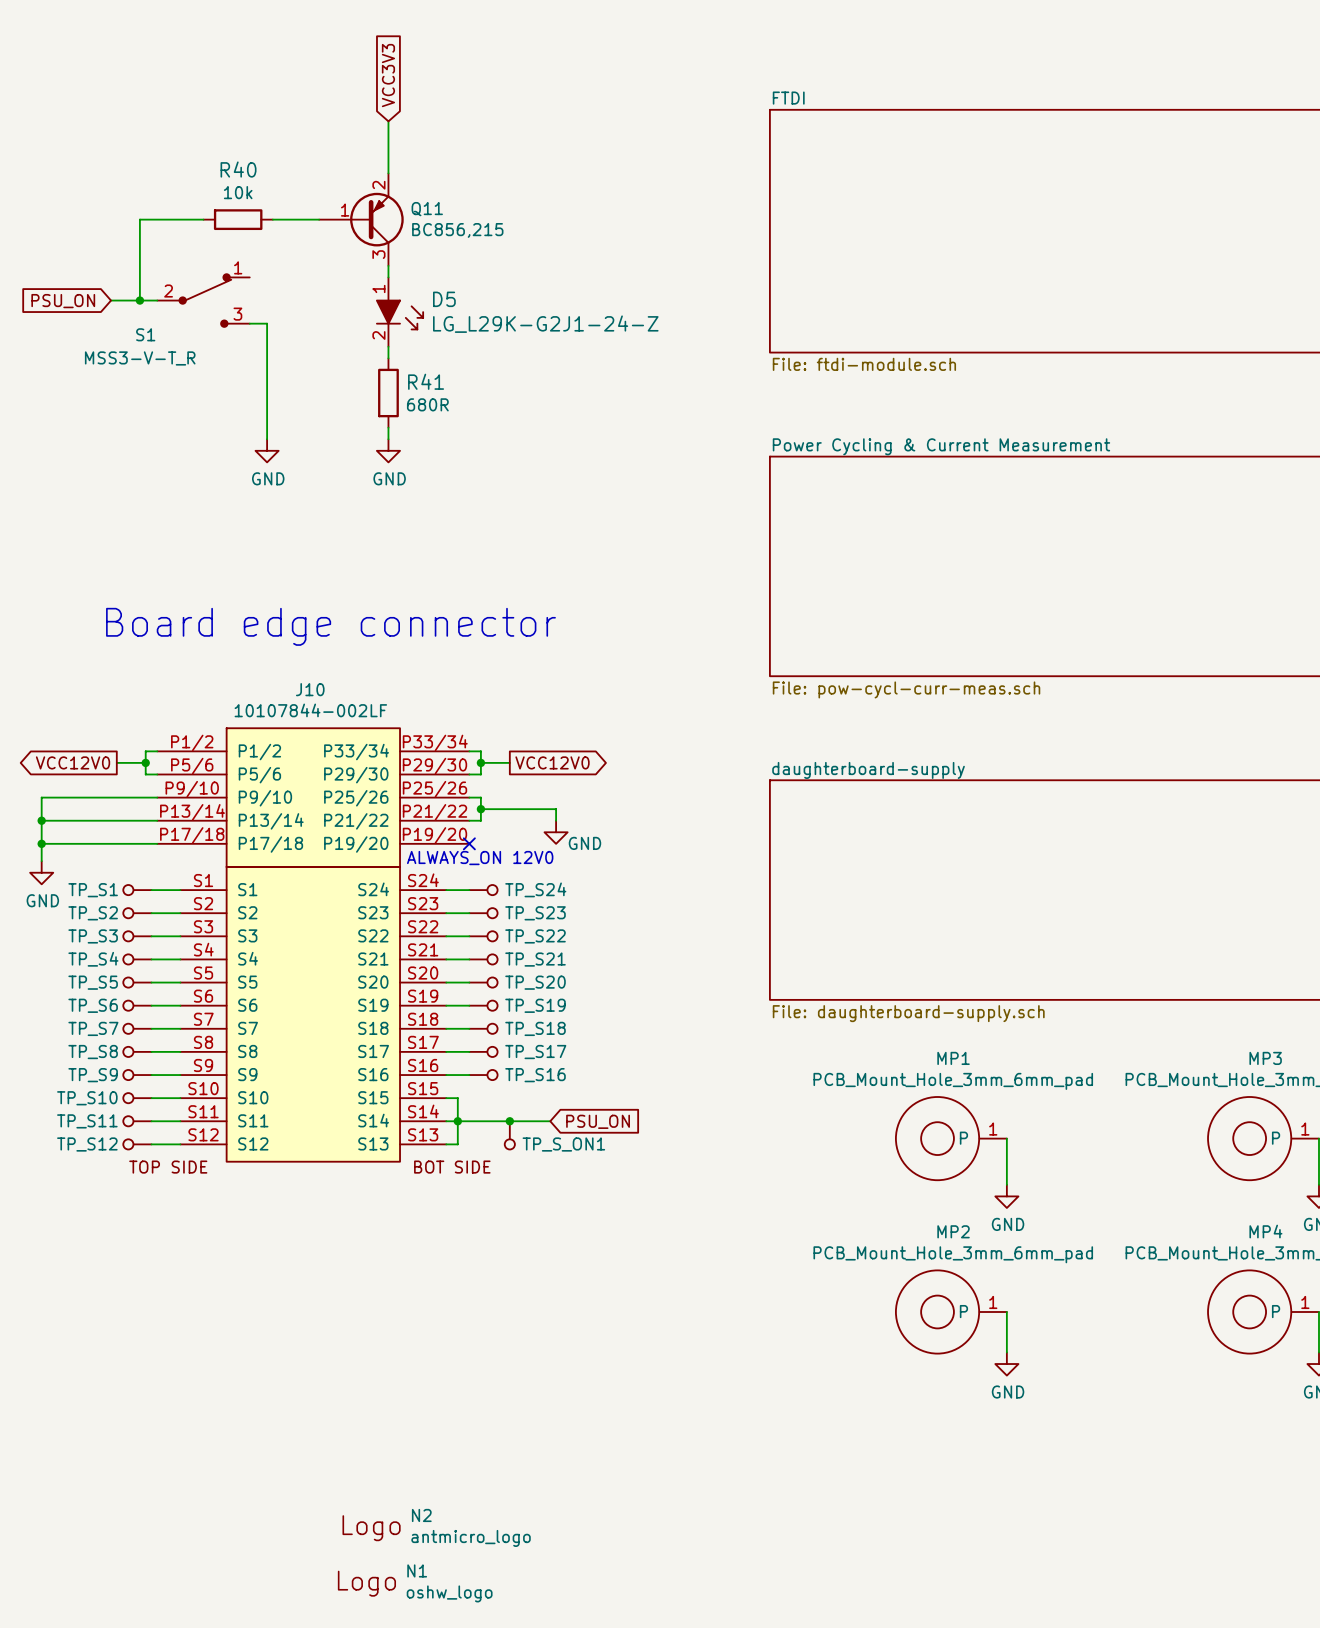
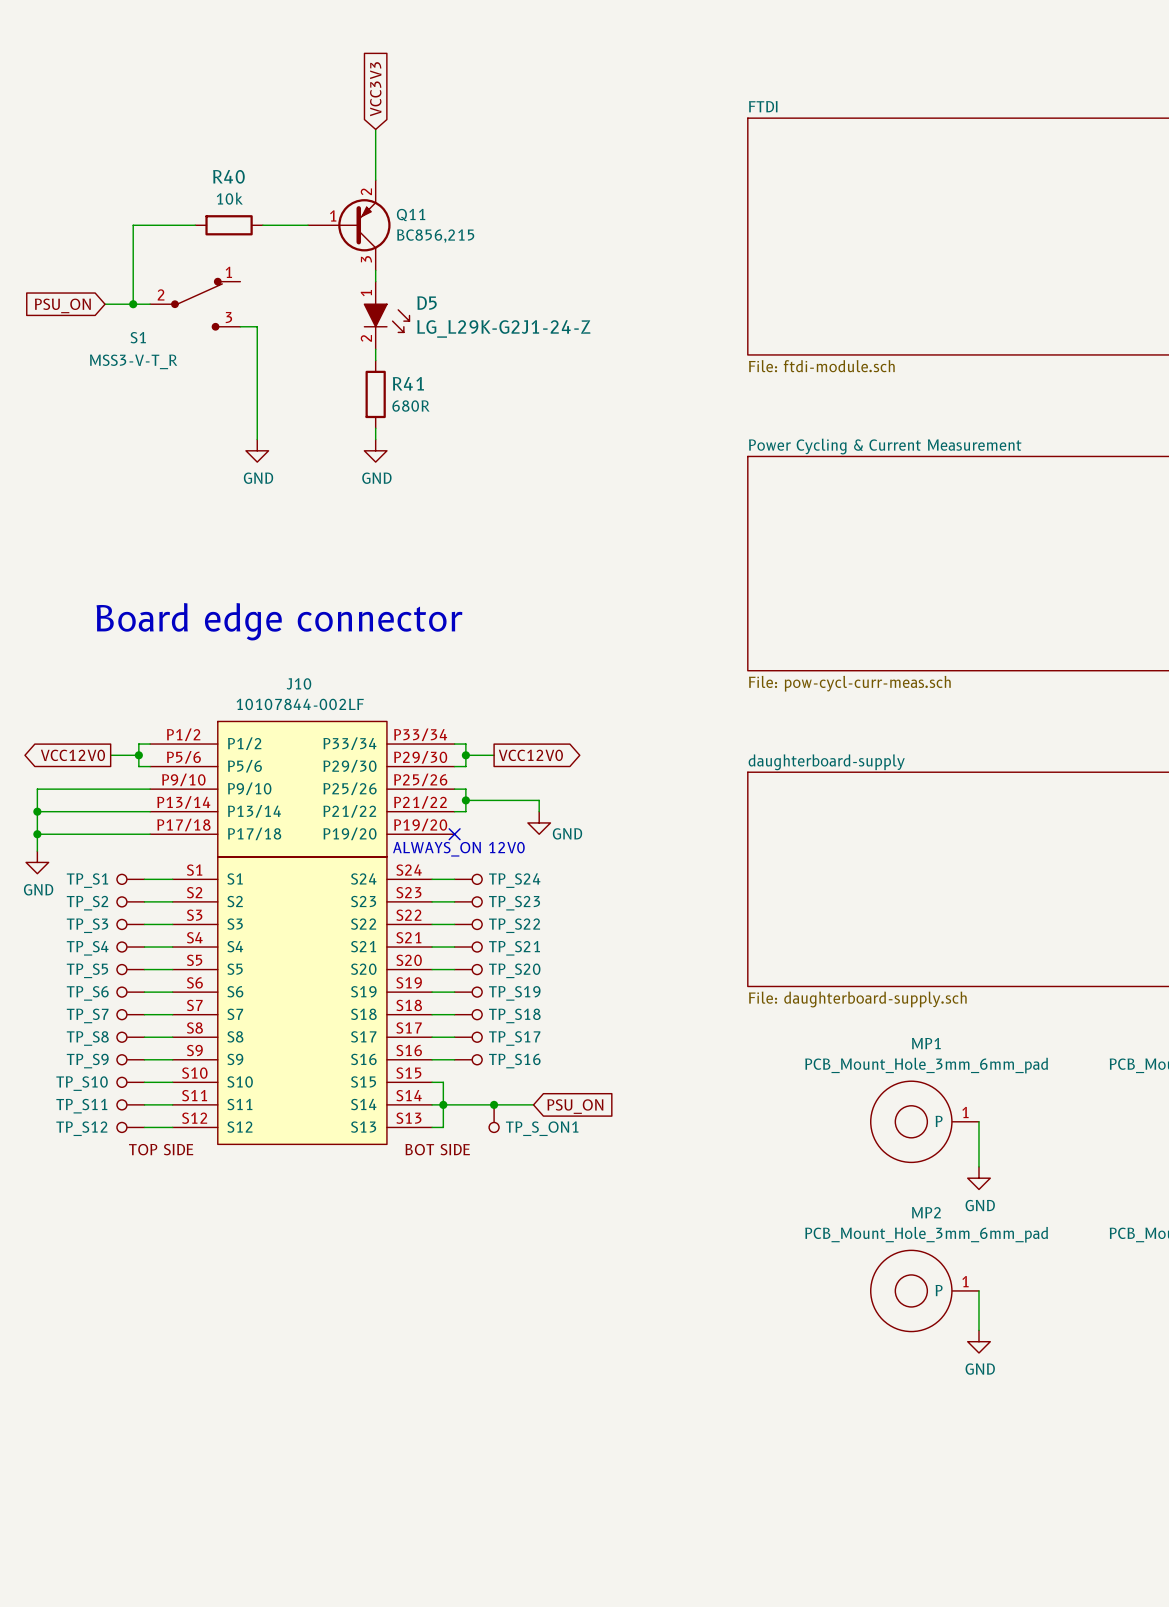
N2: antmicro_logo (436, 1527) -> none
N1: oshw_logo (415, 1583) -> none

